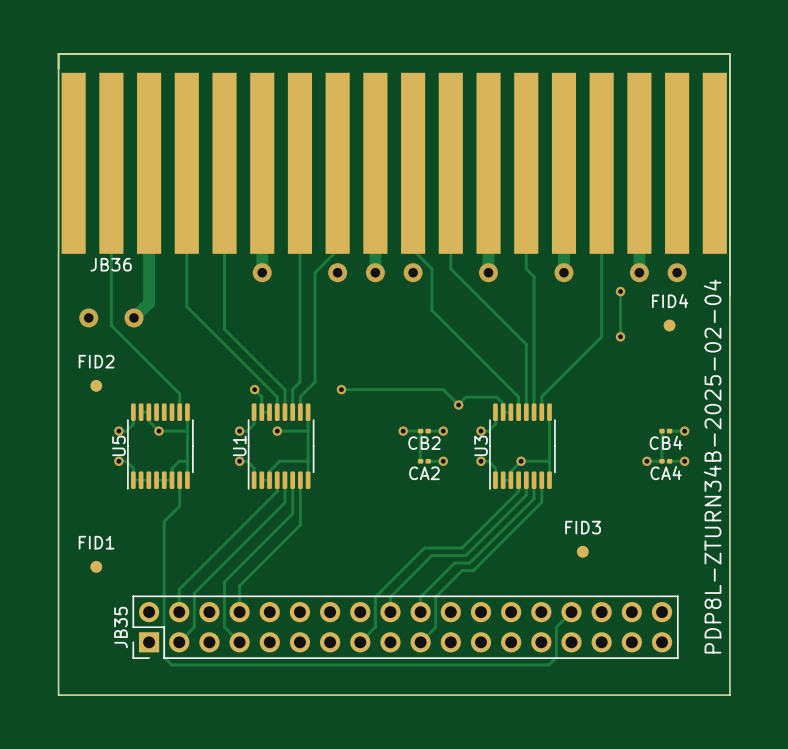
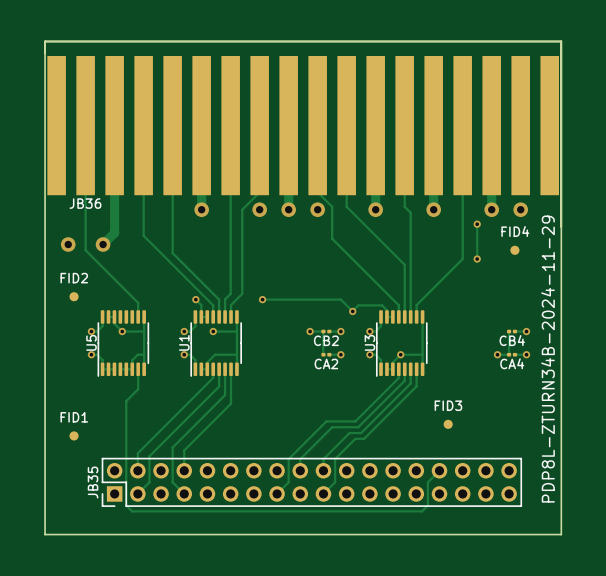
text: PDP8L-ZTURN34B-2025-02-04 (712, 466) -> PDP8L-ZTURN34B-2024-11-29 (548, 359)

